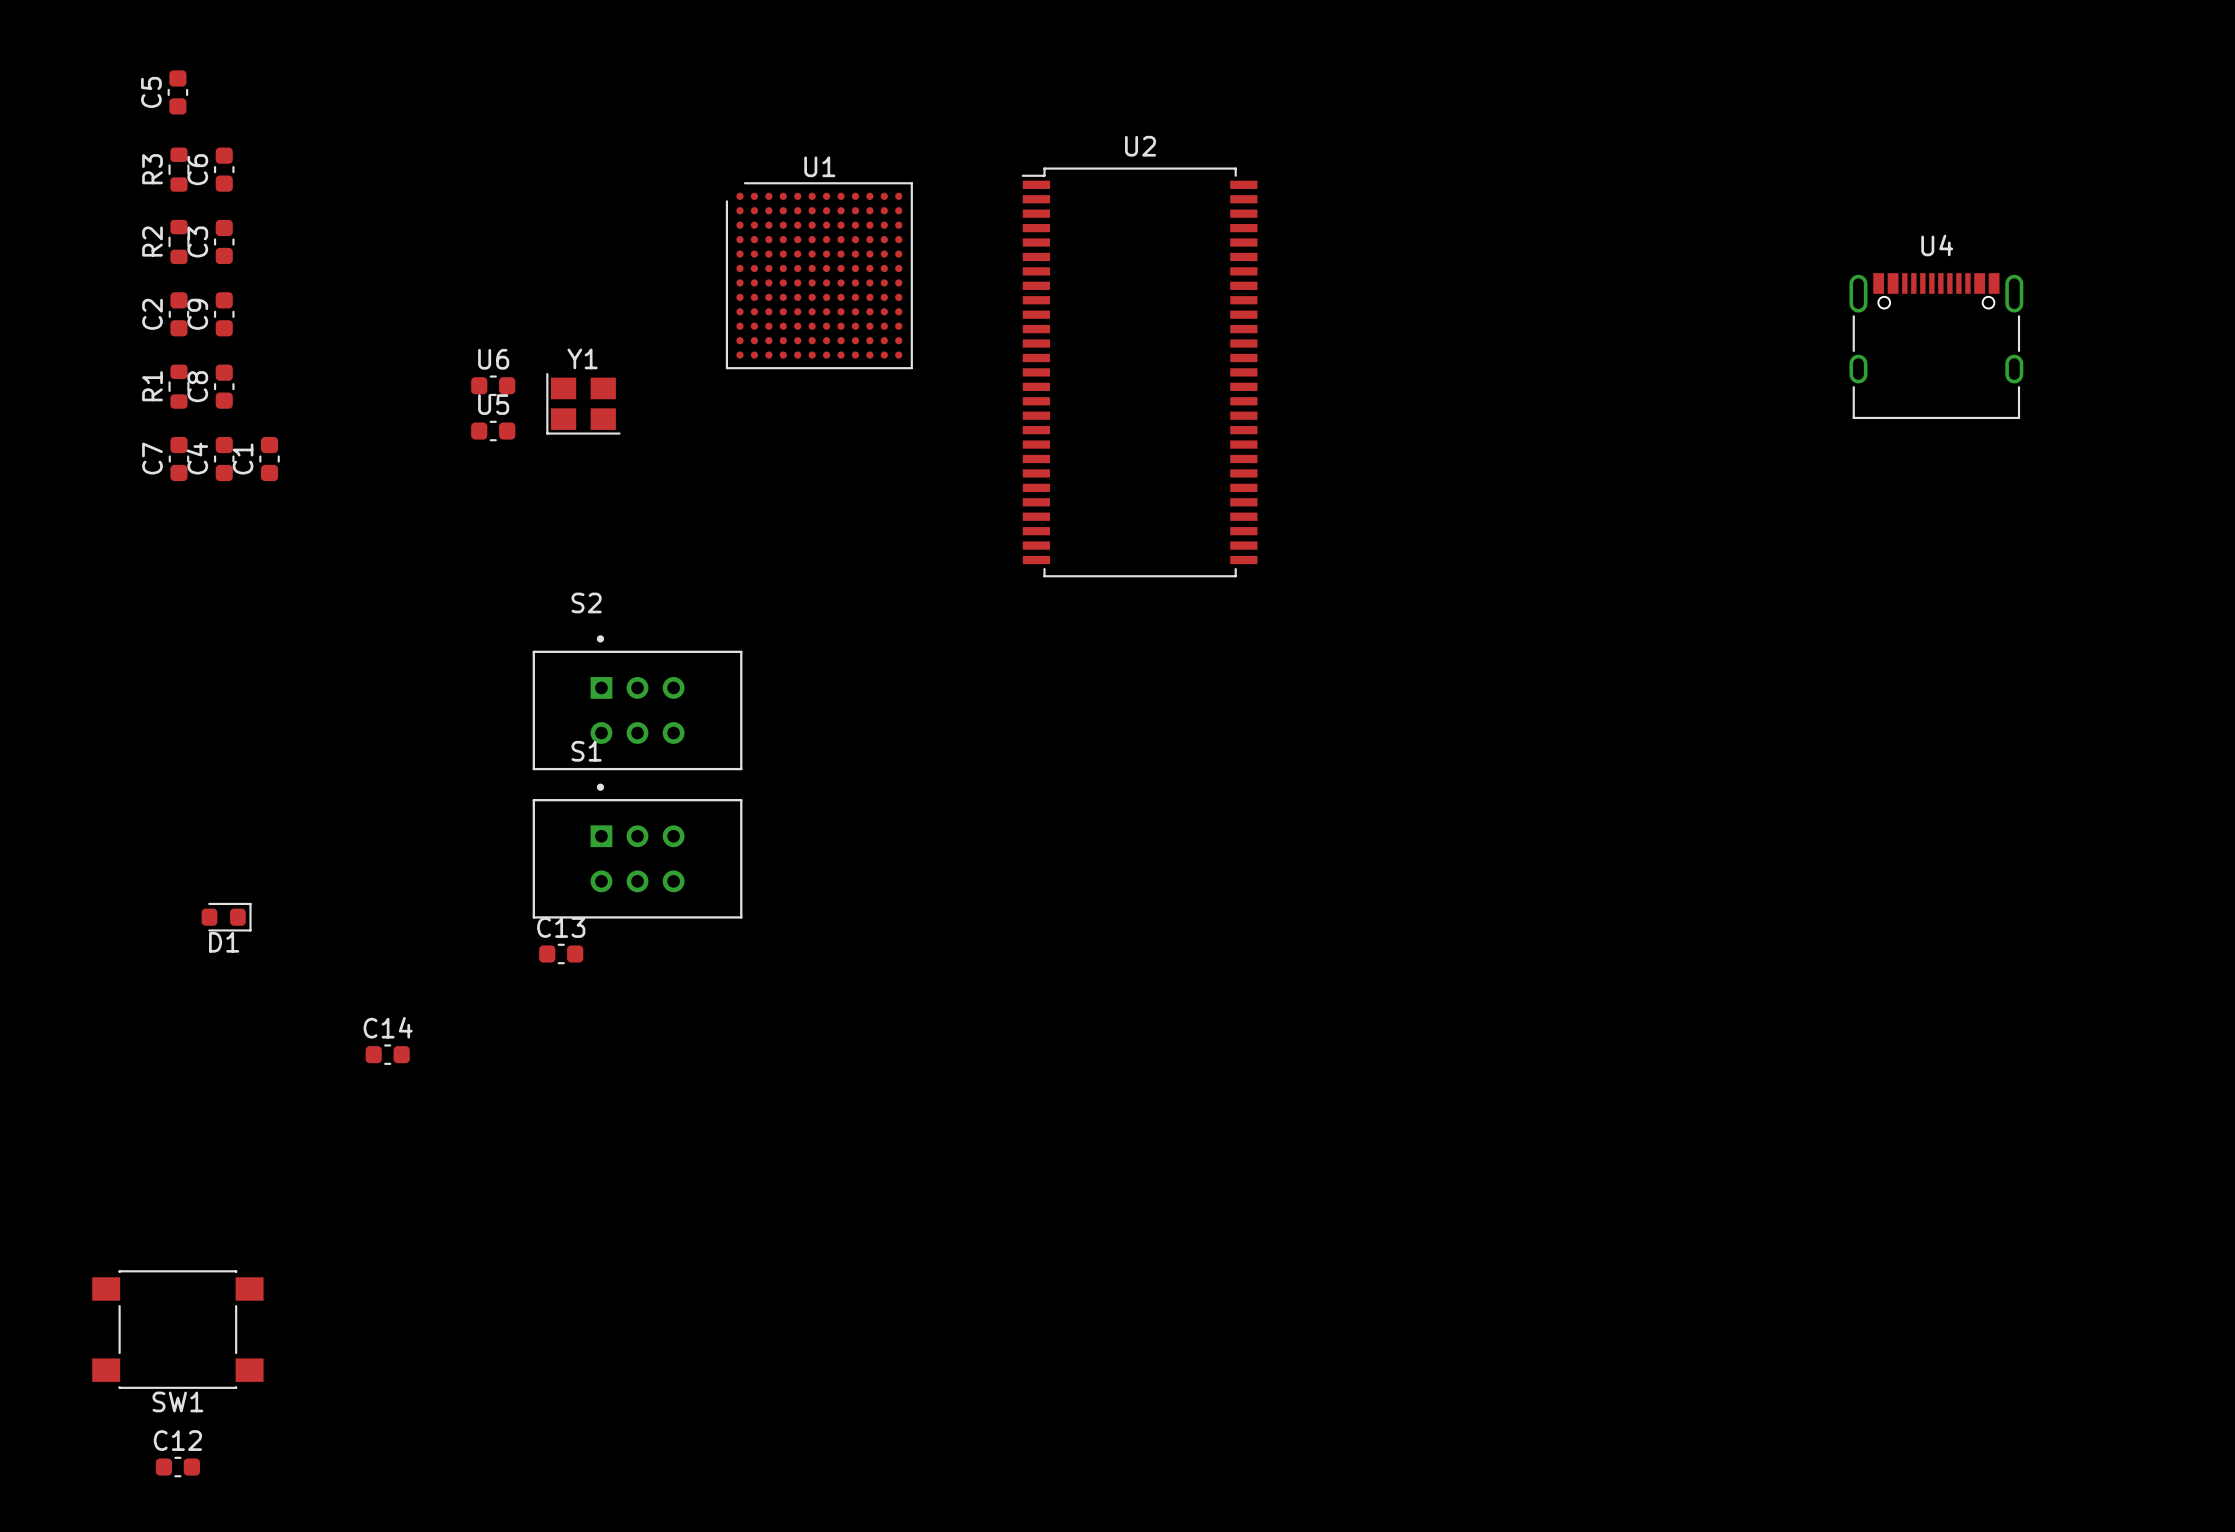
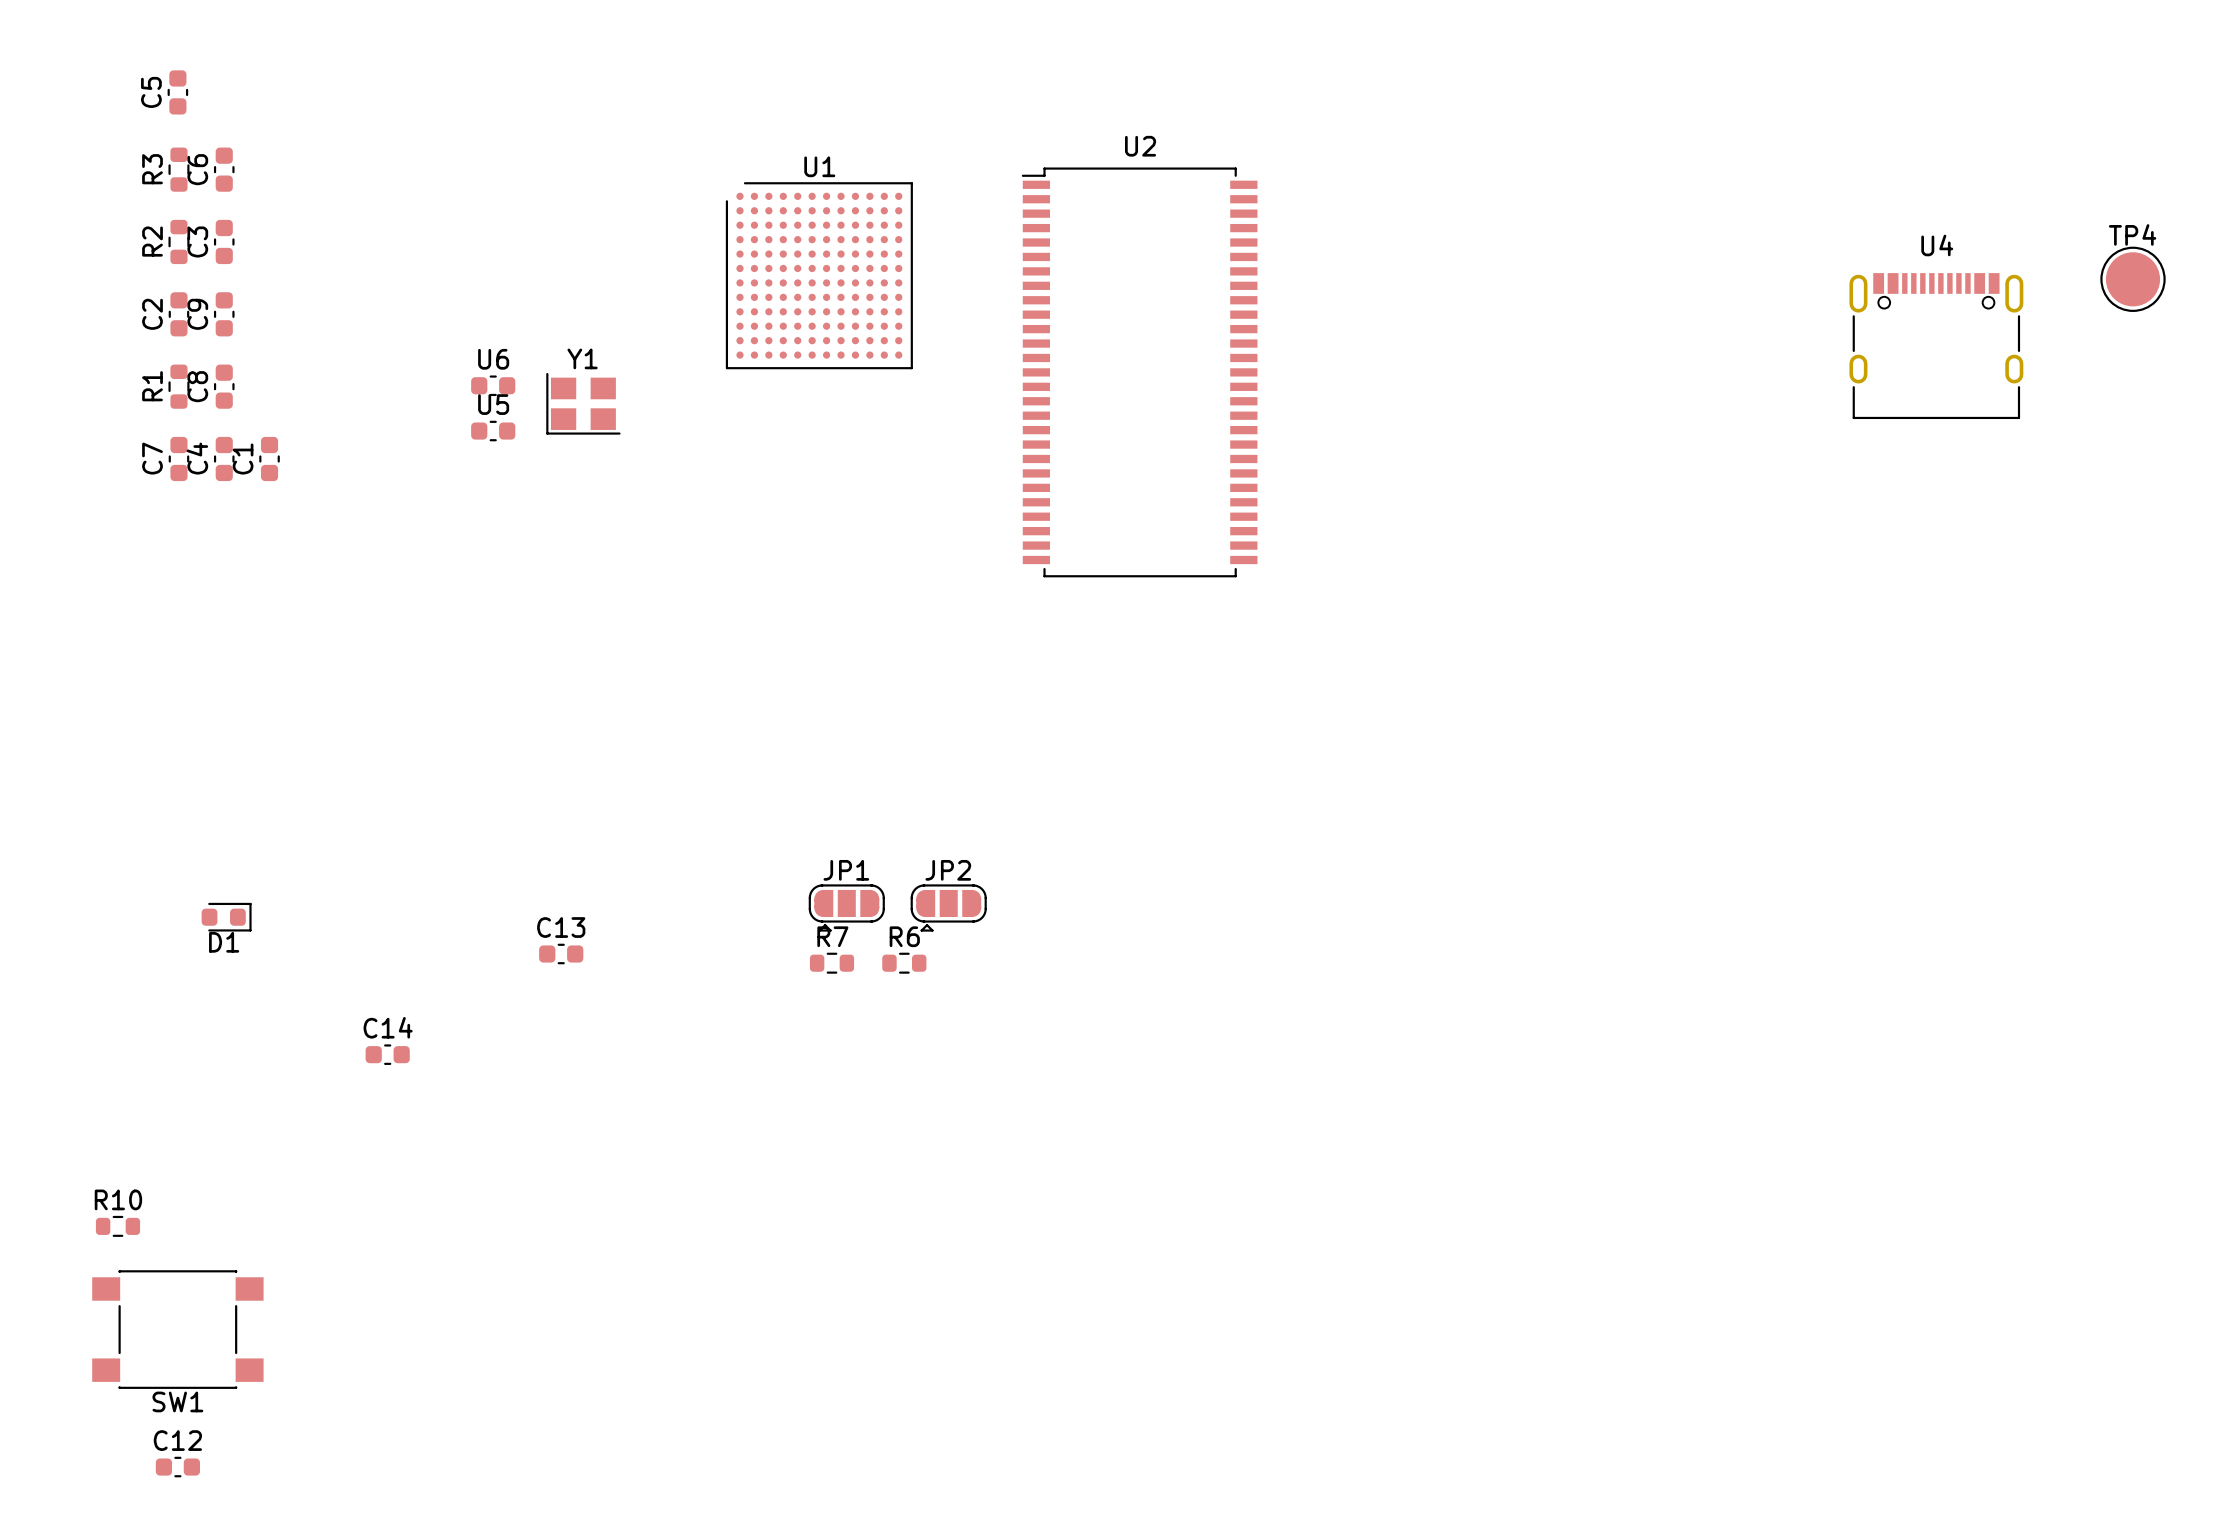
TP4: none -> (2133, 279)
S2: (637, 702) -> none
S1: (637, 851) -> none
JP1: none -> (846, 907)
JP2: none -> (948, 907)
R7: none -> (832, 963)
R6: none -> (904, 963)
R10: none -> (118, 1226)

